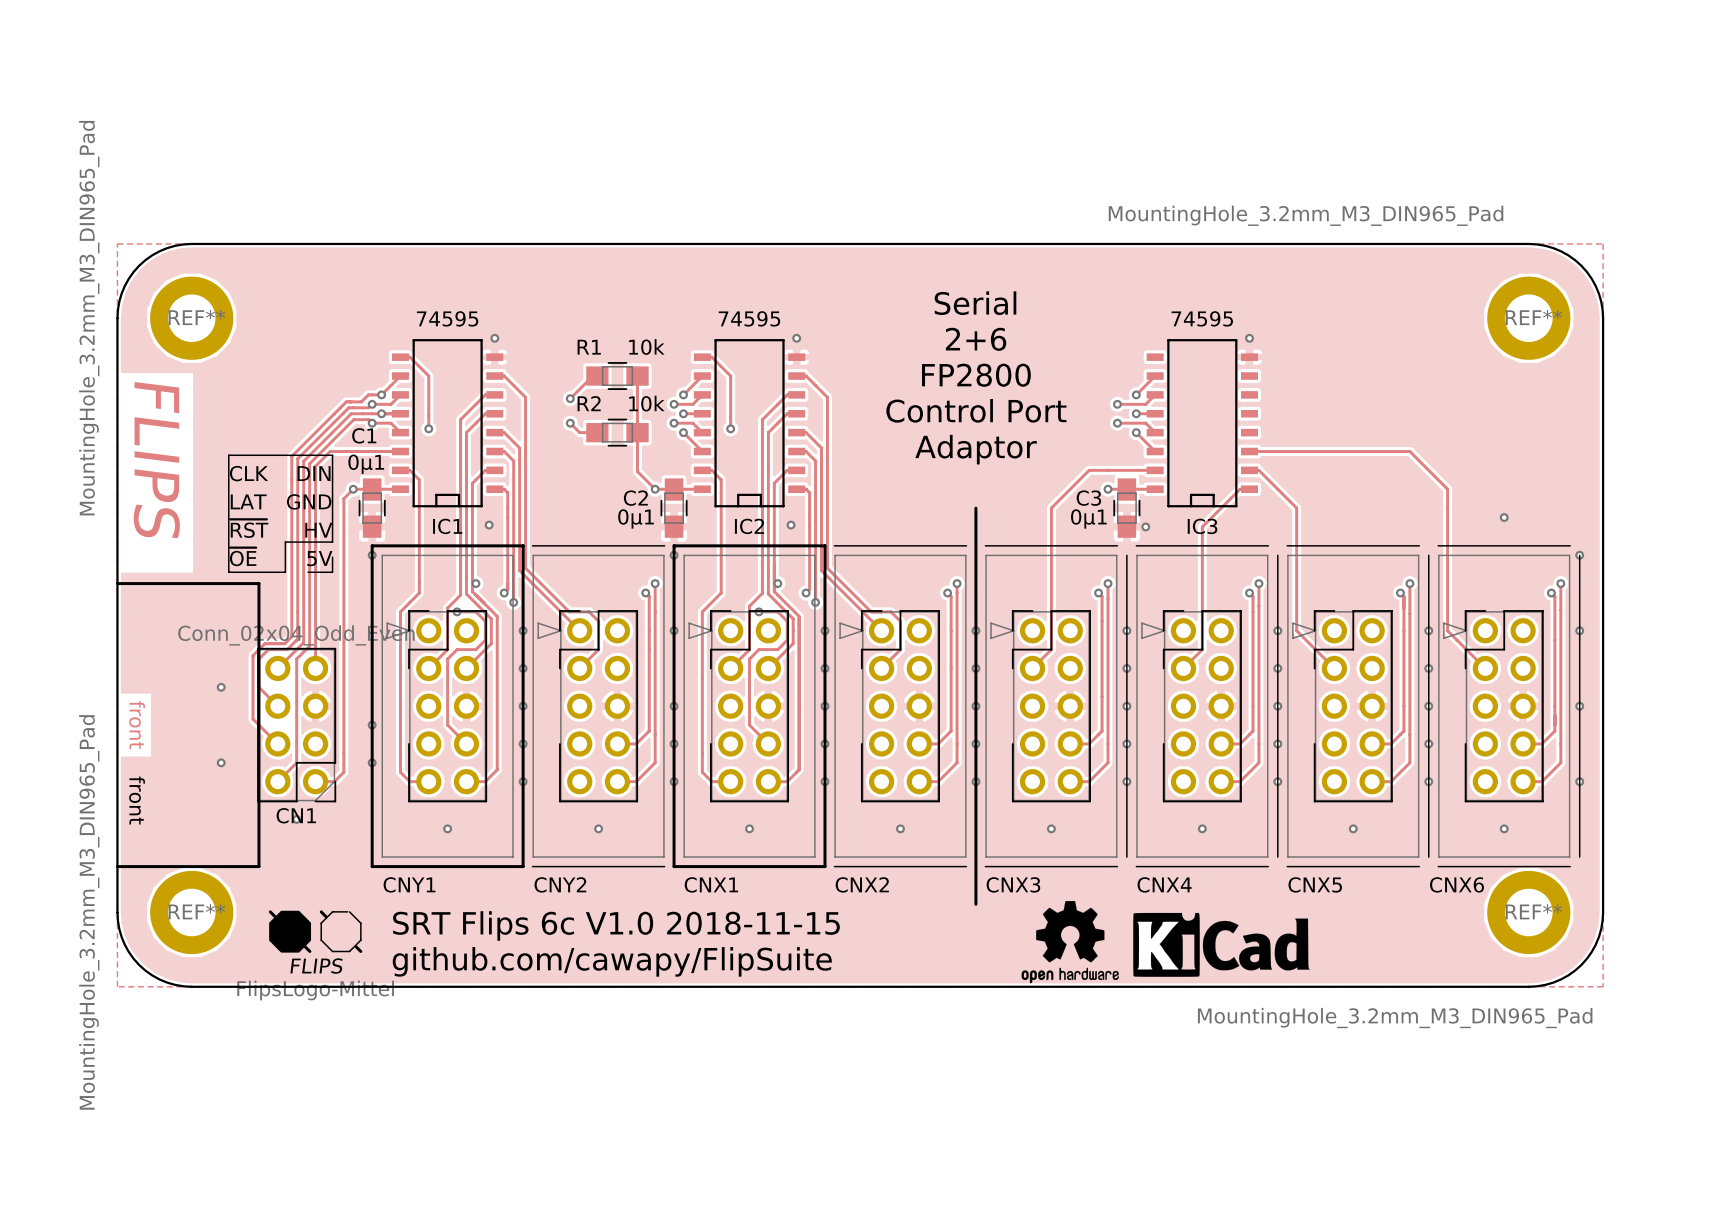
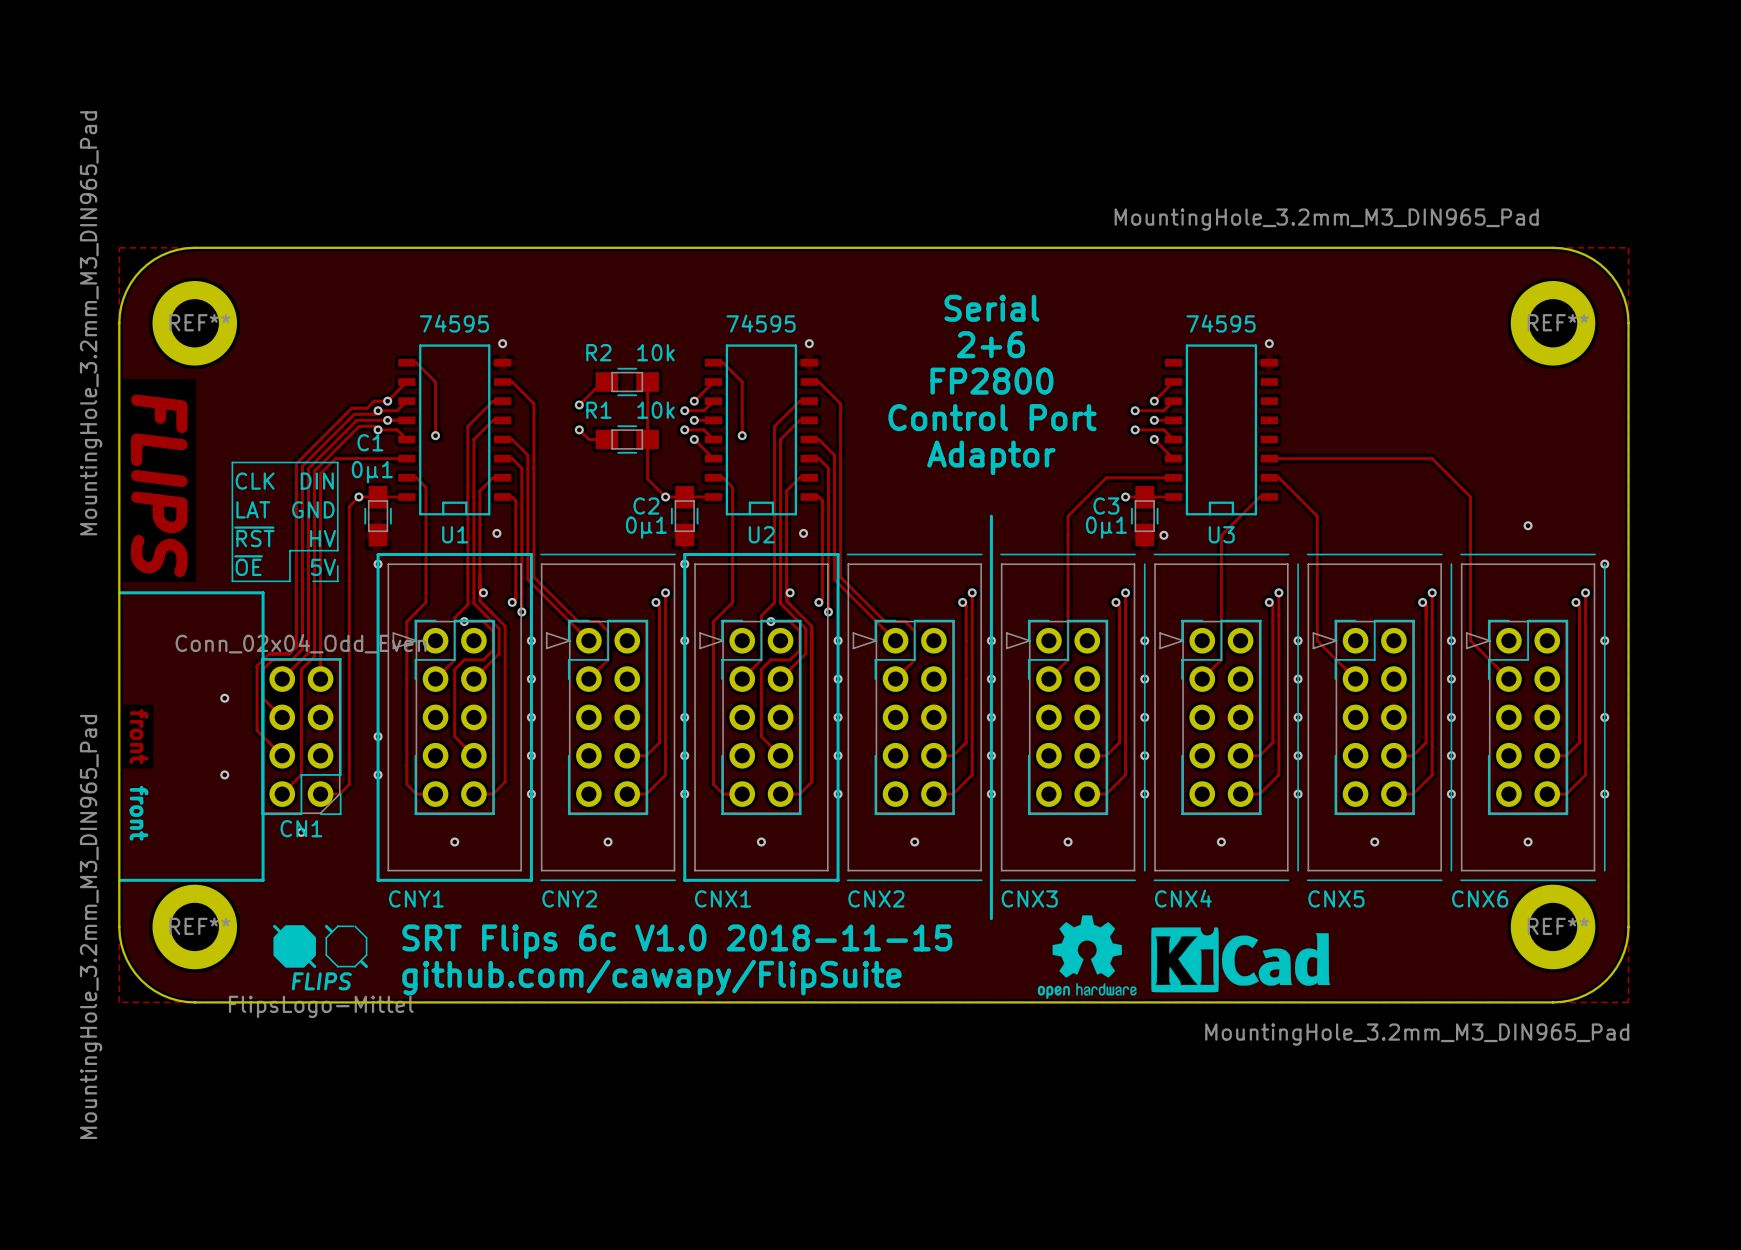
R1 name: R1 (589, 347) -> R2 (598, 352)
R2 name: R2 (589, 403) -> R1 (598, 410)
IC1 name: IC1 (447, 526) -> U1 (455, 534)
IC2 name: IC2 (749, 526) -> U2 (761, 534)
IC3 name: IC3 (1202, 526) -> U3 (1221, 534)

